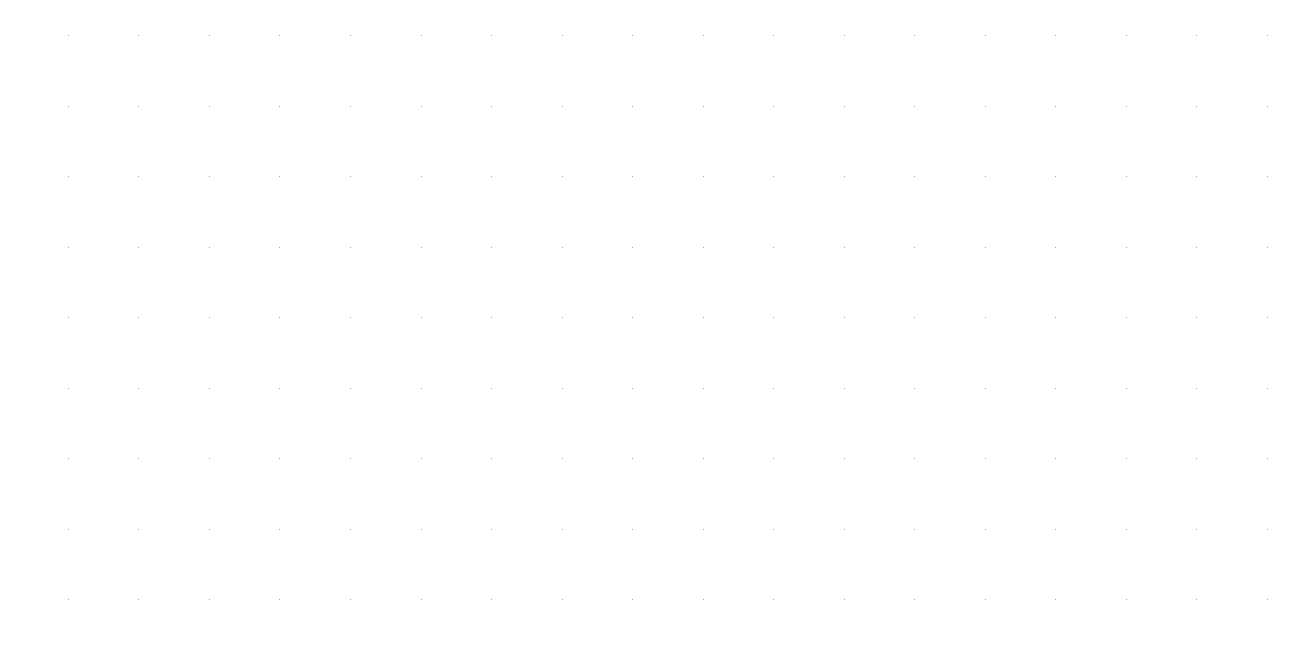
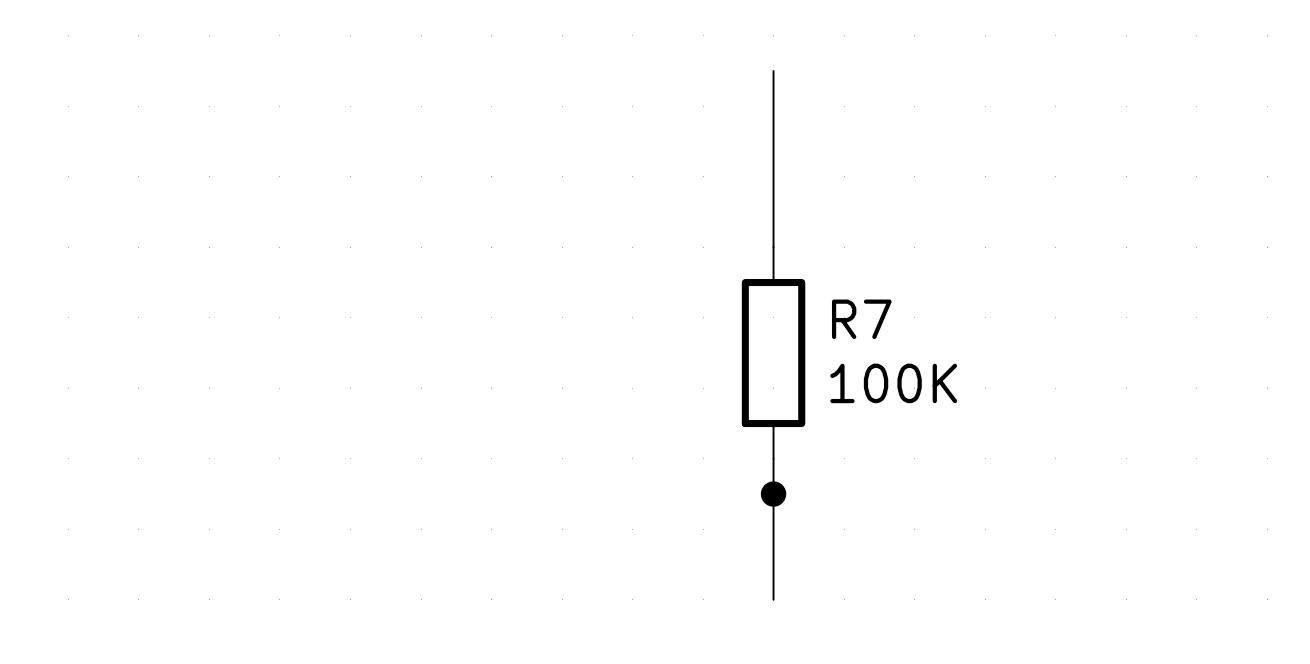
wire: none -> (773, 70) (773, 247)
R7: none -> 100K (773, 353)
wire: none -> (773, 458) (773, 599)
junction: none -> (773, 494)

